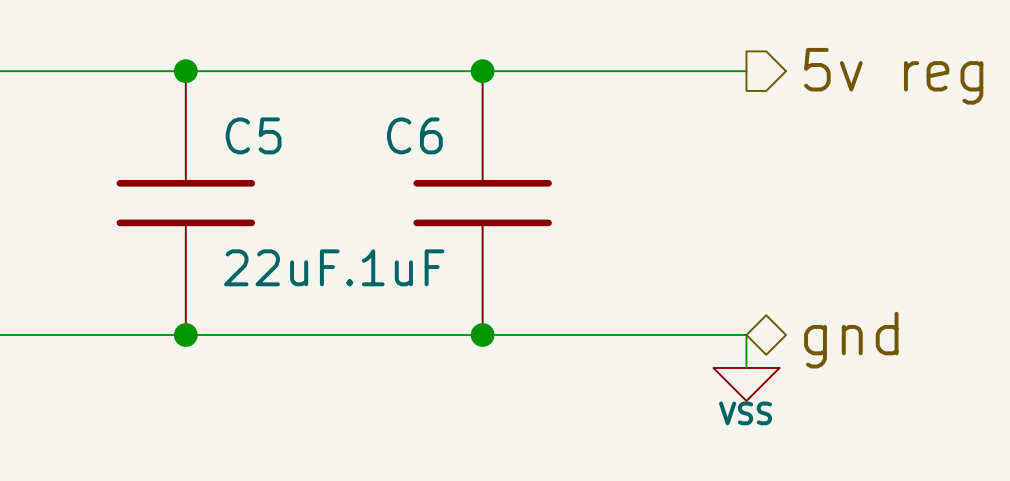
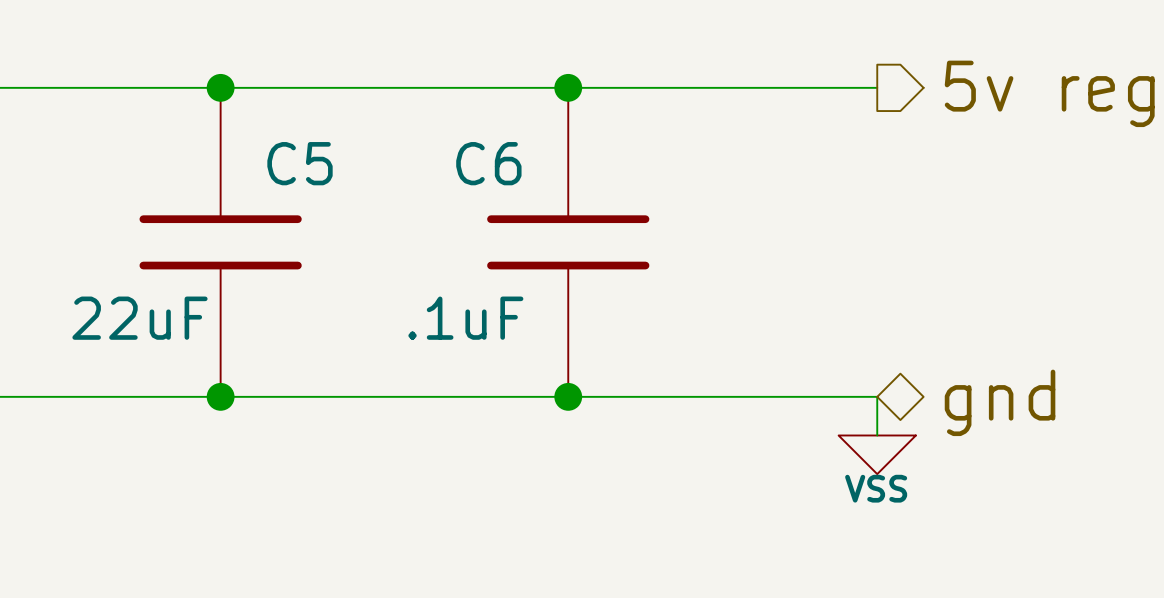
C5 value position: 22uF (281, 267) -> 22uF (139, 318)

